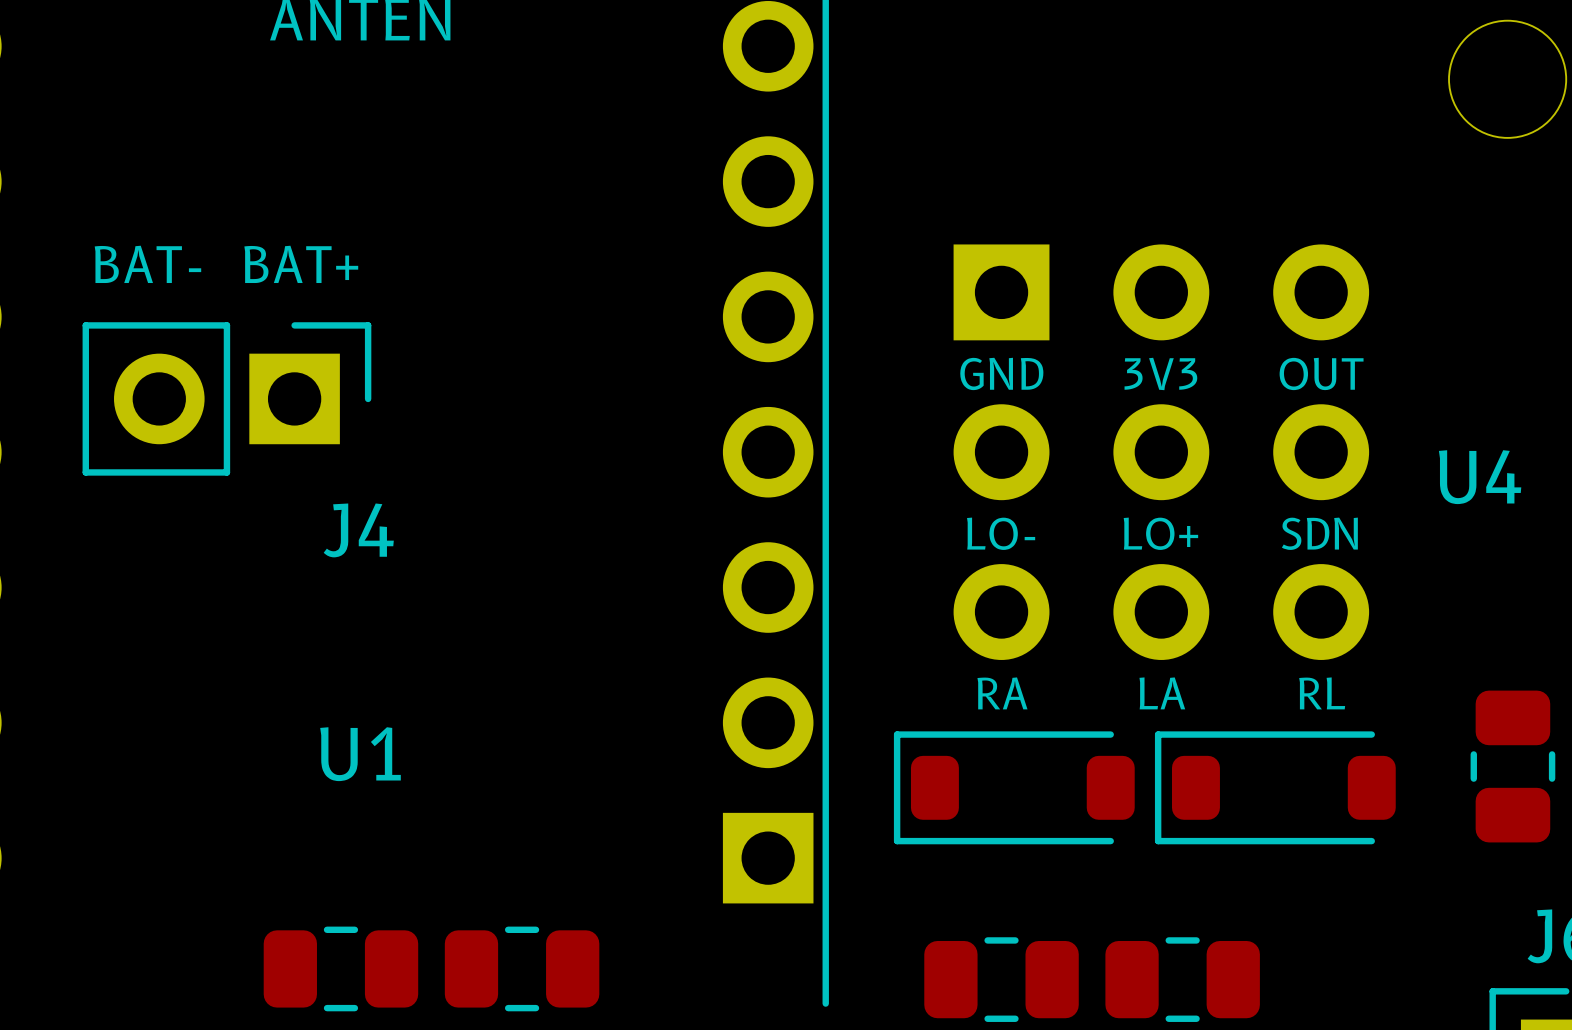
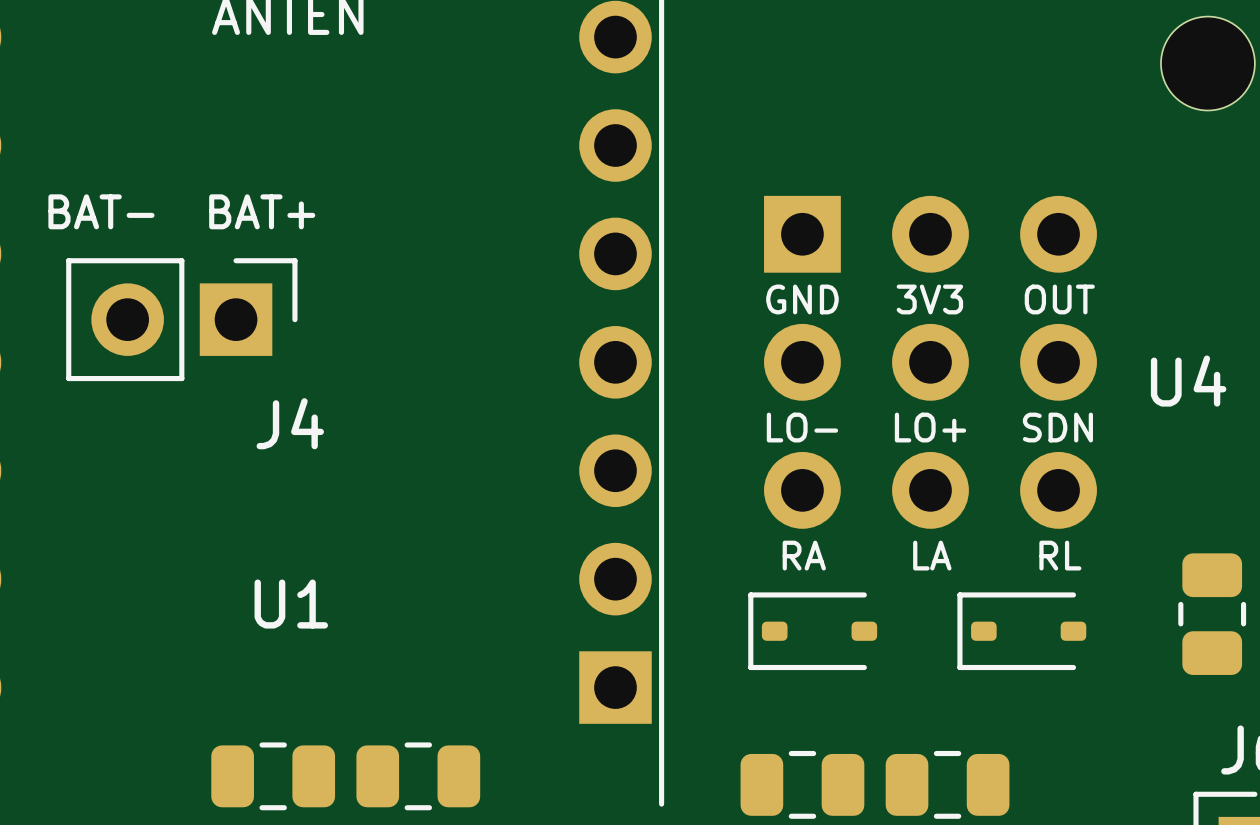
part footprint: [893, 731, 1135, 845] -> [748, 592, 878, 671]
part footprint: [1154, 731, 1396, 845] -> [957, 592, 1087, 671]

